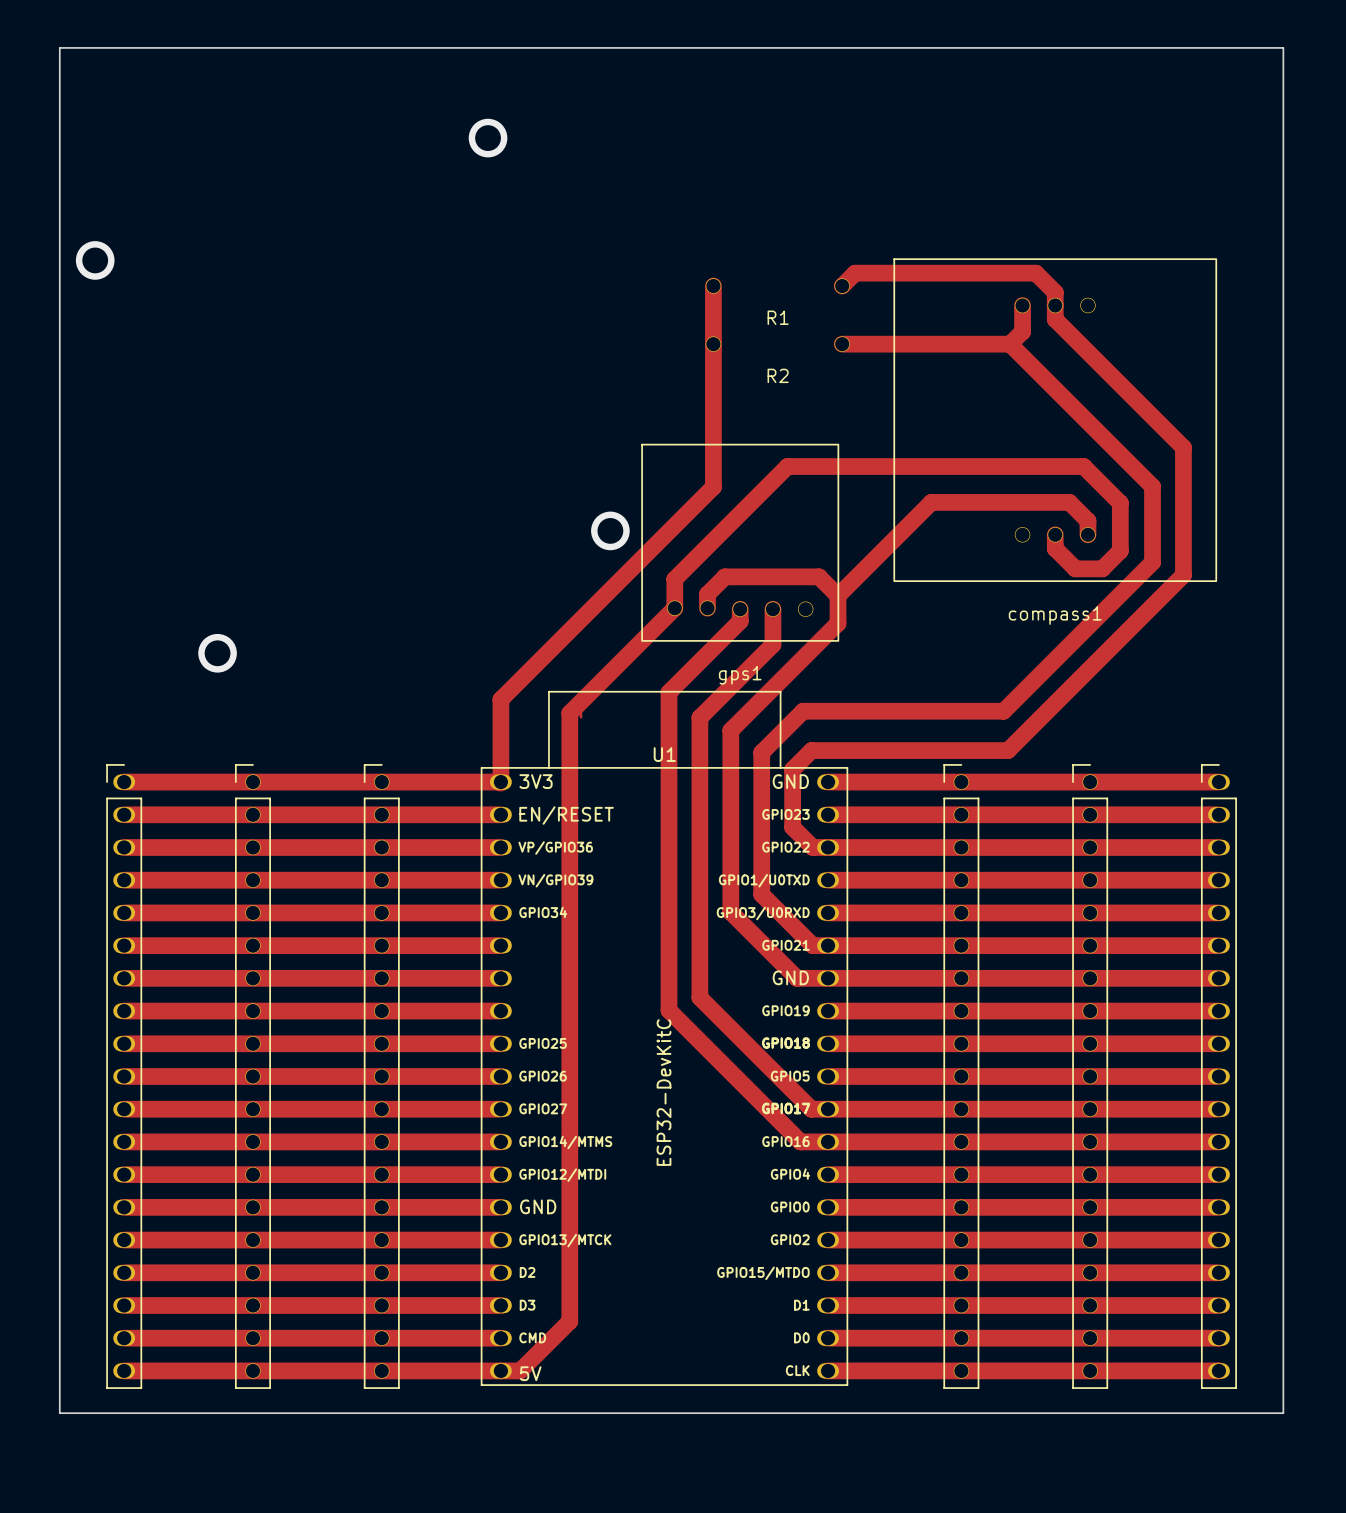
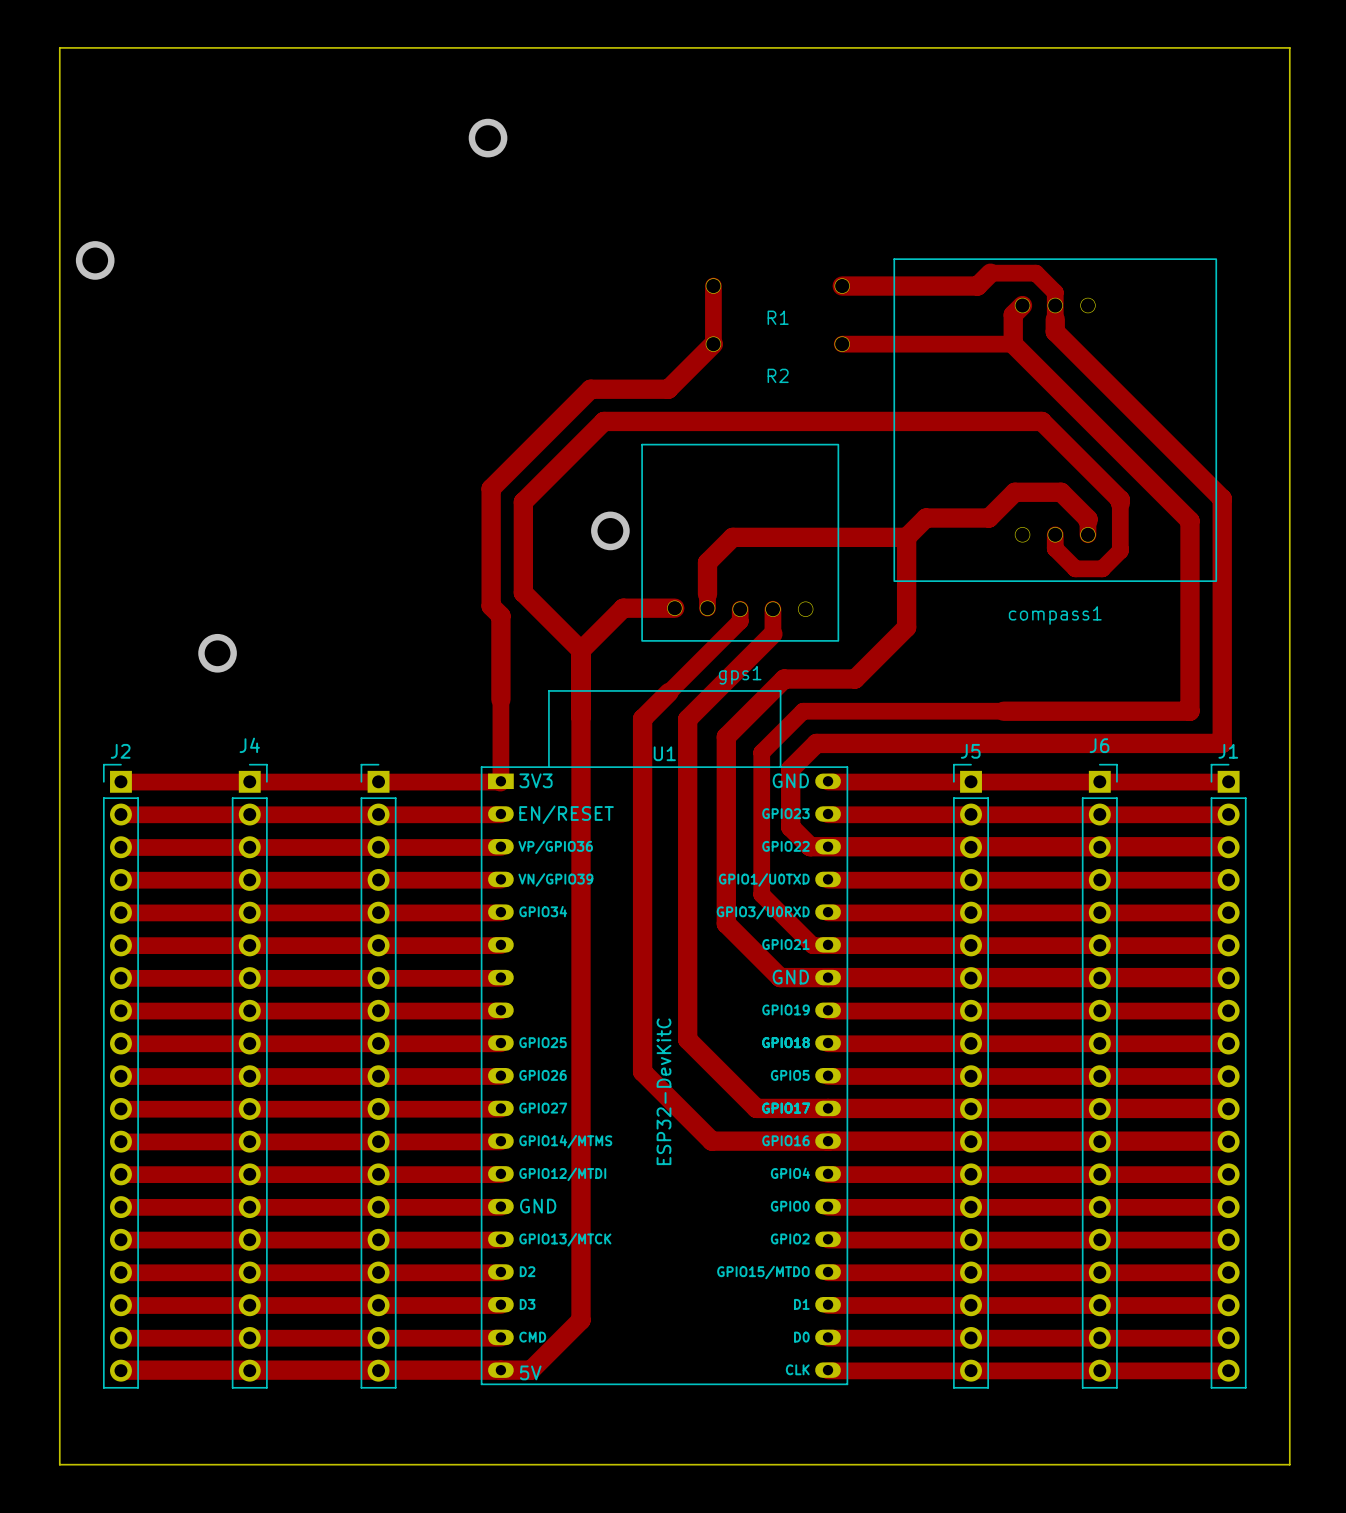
board edge: (1283, 47) (1283, 1413) (59, 1413) -> (1283, 47) (1289, 47) (1289, 1464) (59, 1464) (59, 1413)
track: (990, 273) (855, 273) (842, 286) -> (990, 273) (977, 286) (842, 286)
track: (1022, 305) (1022, 331) (1010, 344) (1152, 486) (1152, 562) (1003, 711) -> (1022, 305) (1013, 314) (1013, 344) (1189, 520) (1189, 711) (1003, 711)
track: (1055, 319) (1183, 447) (1183, 575) (1008, 750) (811, 750) (792, 769) (792, 827) (812, 847) (1218, 847) -> (1055, 319) (1055, 331) (1222, 498) (1222, 743) (816, 743) (790, 769) (790, 827) (810, 846) (1228, 847)
track: (713, 344) (713, 487) (500, 699) -> (713, 344) (668, 389) (590, 389) (491, 488) (491, 606) (500, 615) (500, 699)
track: (1120, 503) (1083, 466) (787, 466) (674, 579) (674, 608) (569, 713) (569, 1321) (520, 1370) (124, 1370) -> (1120, 503) (1120, 499) (1041, 421) (603, 421) (523, 502) (523, 592) (580, 650)
track: (1087, 520) (1069, 502) (931, 502) (838, 595) -> (1087, 520) (1061, 492) (1014, 492) (989, 518) (925, 518) (906, 537)
track: none -> (906, 537) (906, 627) (855, 679) (784, 679) (726, 736) (726, 923) (780, 977) (1228, 978)
track: (707, 594) (724, 576) (819, 576) (838, 595) -> (707, 594) (707, 562) (732, 537) (906, 537)
track: (838, 595) (838, 623) (730, 730) (730, 912) (797, 978) (1218, 978) -> none
track: none -> (674, 608) (623, 608) (580, 650)
track: (772, 634) (772, 644) (699, 717) (699, 997) (811, 1109) (1218, 1109) -> (772, 634) (687, 719) (687, 1039) (756, 1108) (1228, 1108)
track: none -> (580, 650) (580, 1320) (531, 1370) (120, 1370)
U1 footprint: [480, 690, 849, 1386] -> [480, 690, 849, 1386]
track: (668, 692) (668, 1010) (800, 1141) (1218, 1141) -> (668, 692) (642, 718) (642, 1071) (711, 1141) (1228, 1141)
part footprint: [363, 764, 400, 1389] -> [360, 763, 397, 1389]
J2: none -> (120, 1076)
part: (124, 1076) -> none
J4: none -> (249, 1076)
part: (252, 1076) -> none
part: (961, 1076) -> none
J5: none -> (971, 1076)
part: (1090, 1076) -> none
J6: none -> (1099, 1076)
part: (1218, 1076) -> none
J1: none -> (1228, 1076)

